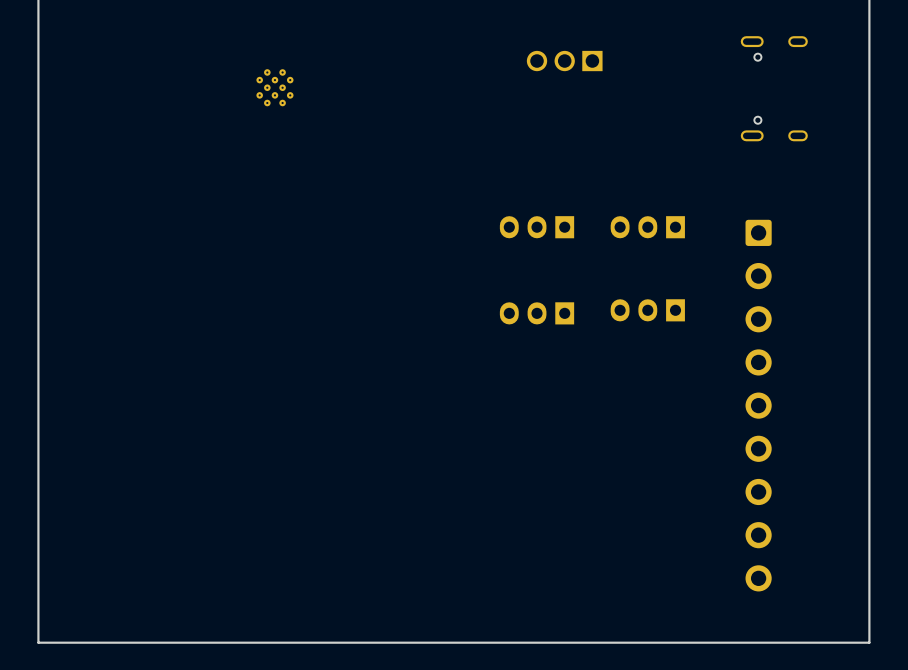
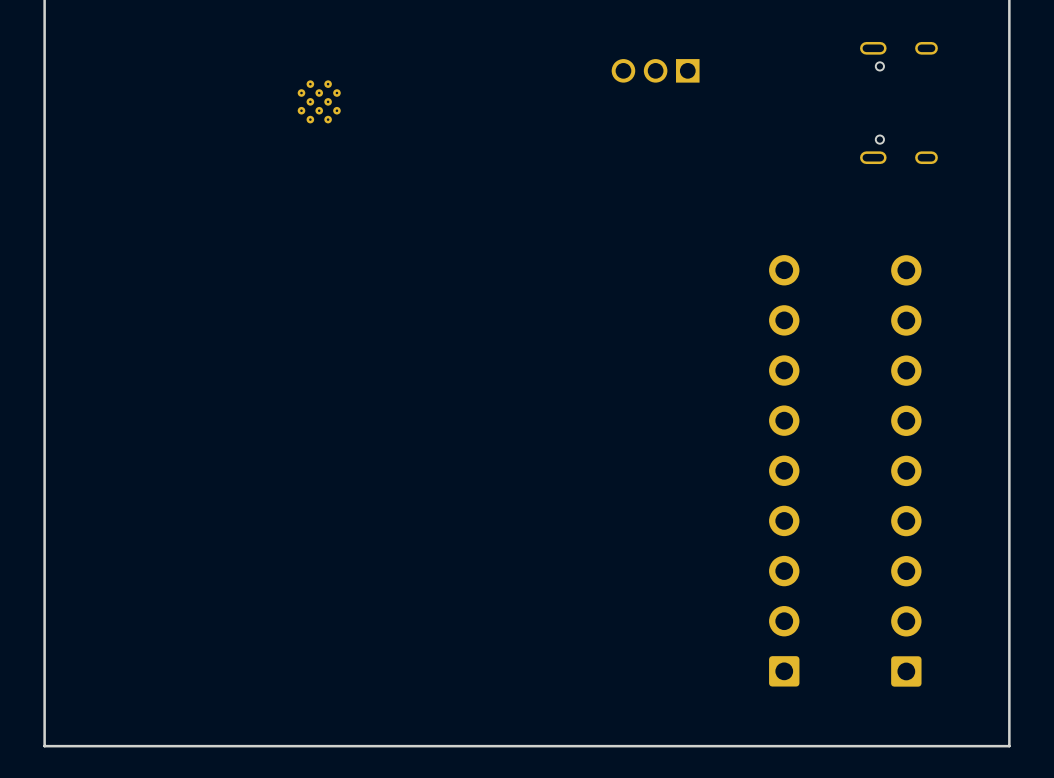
part: (537, 227) -> none
part: (647, 227) -> none
part: (647, 310) -> none
part: (537, 313) -> none
part: none -> (784, 470)
part rotation: 0° (758, 405) -> 180° (906, 470)

